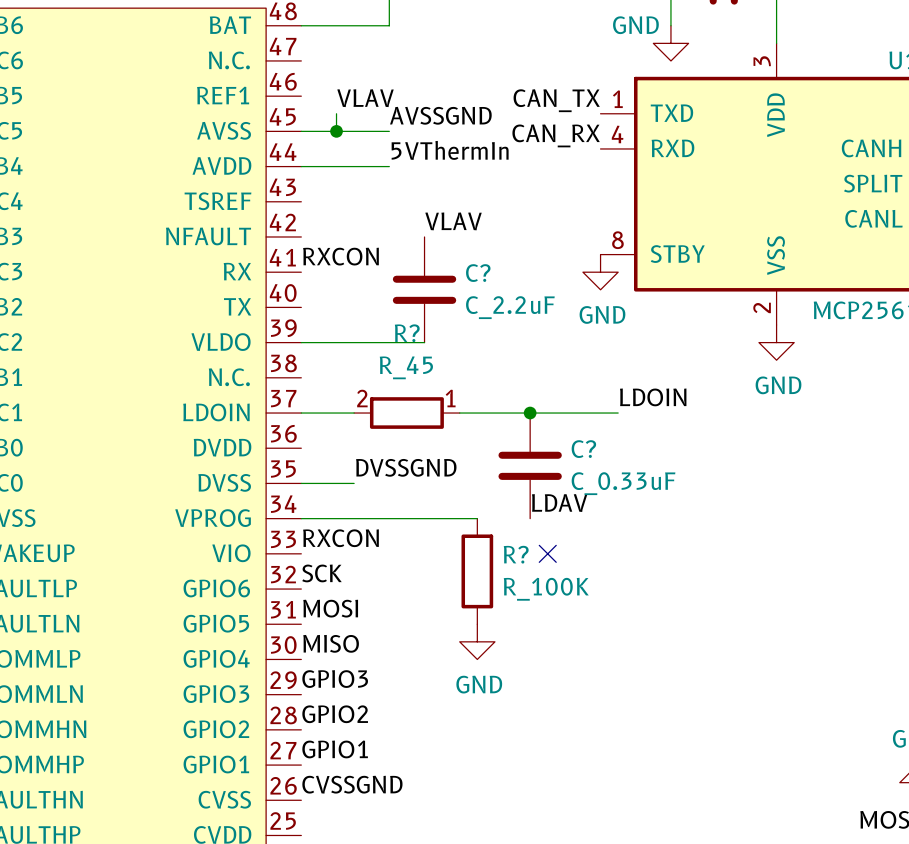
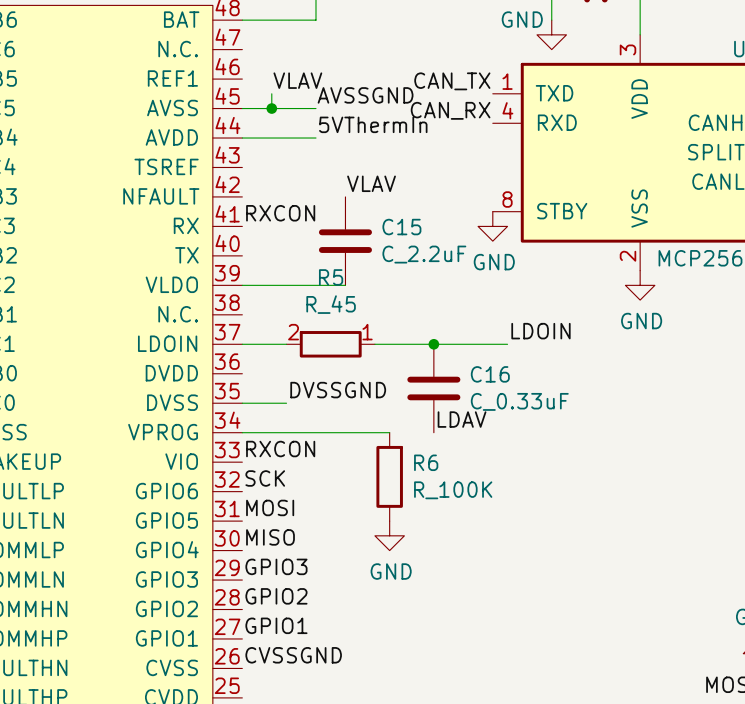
C? name: C? (478, 273) -> C15 (401, 227)
R? name: R? (407, 333) -> R5 (331, 277)
C? name: C? (583, 449) -> C16 (490, 374)
no-connect mark: (547, 553) -> none
R? name: R? (516, 554) -> R6 (426, 462)

